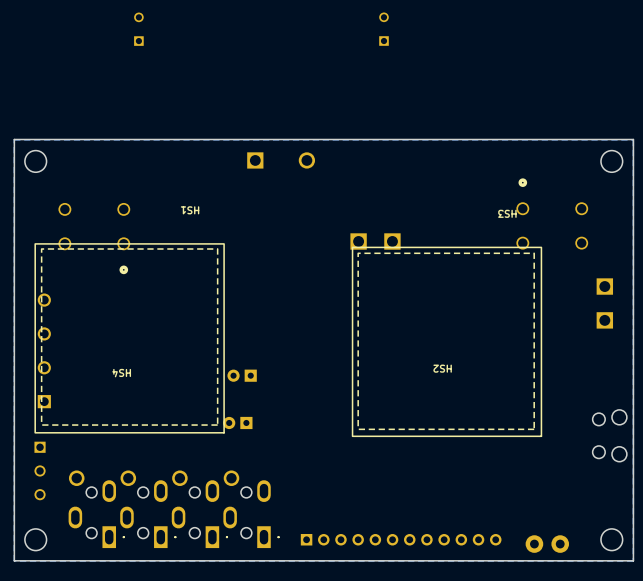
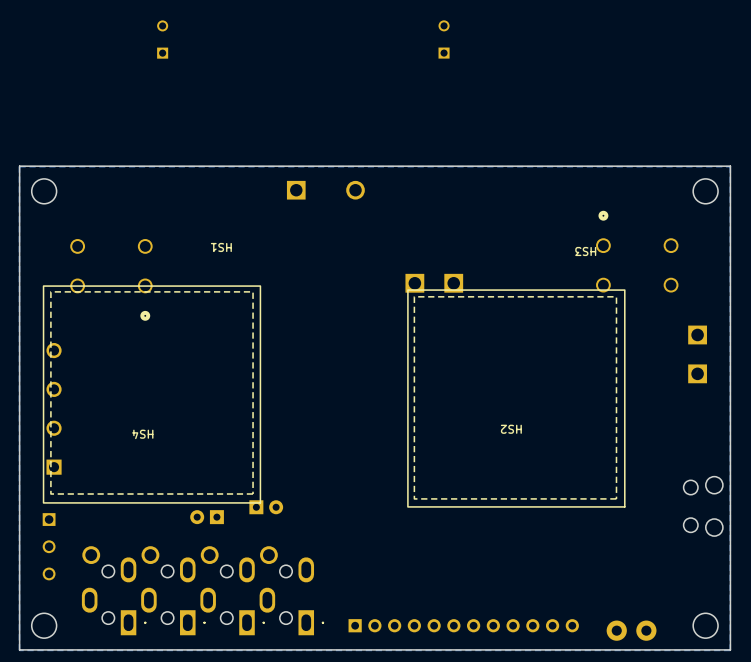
part: (242, 375) -> none
part rotation: 0° (237, 422) -> 180° (266, 507)
part: none -> (207, 517)

